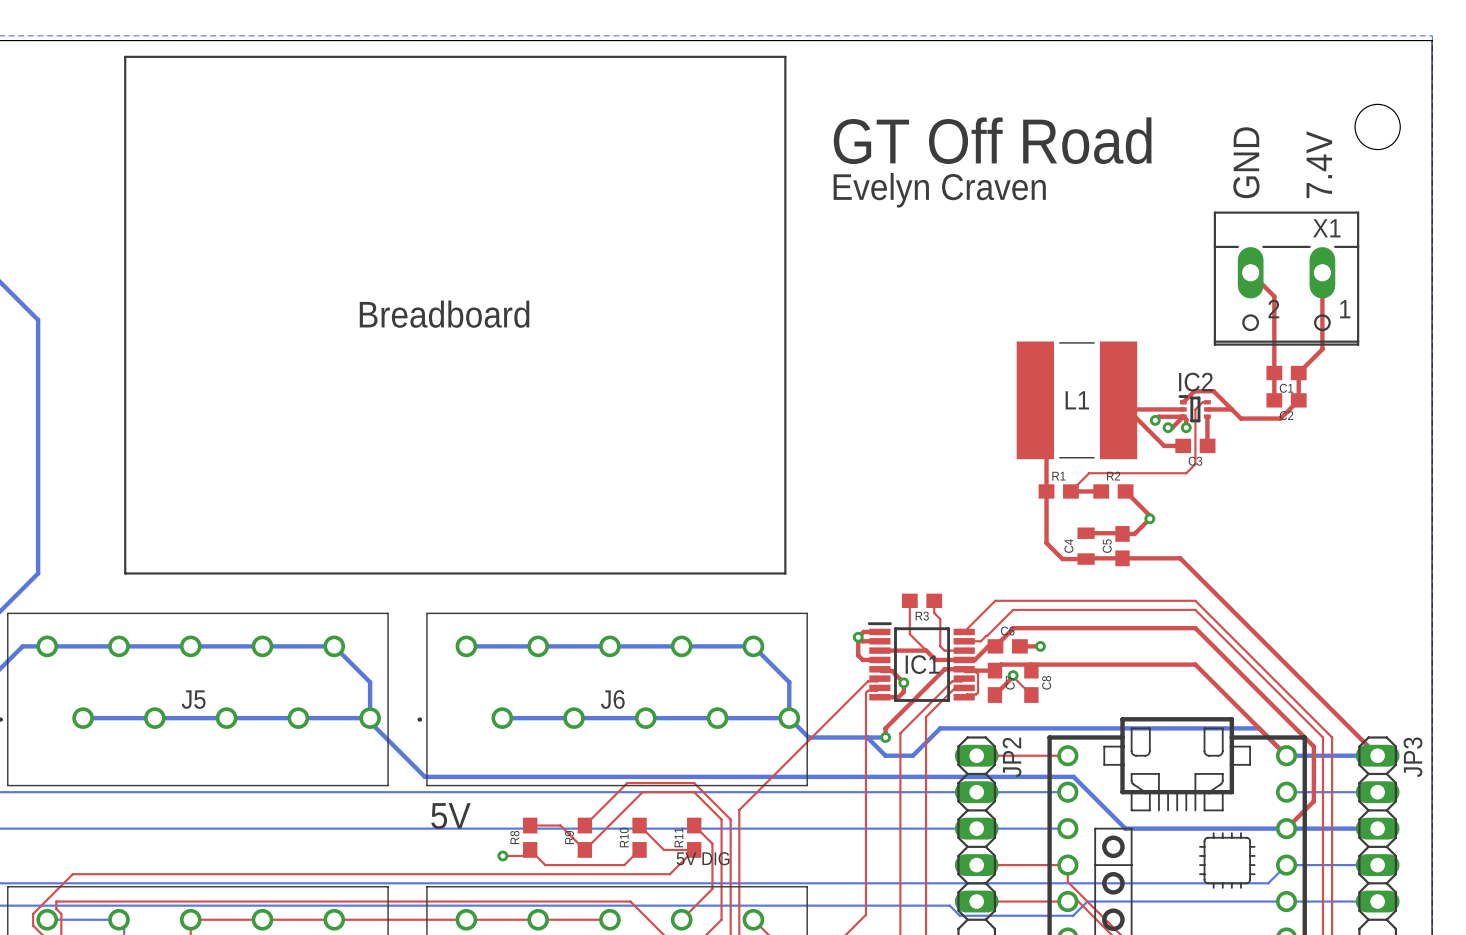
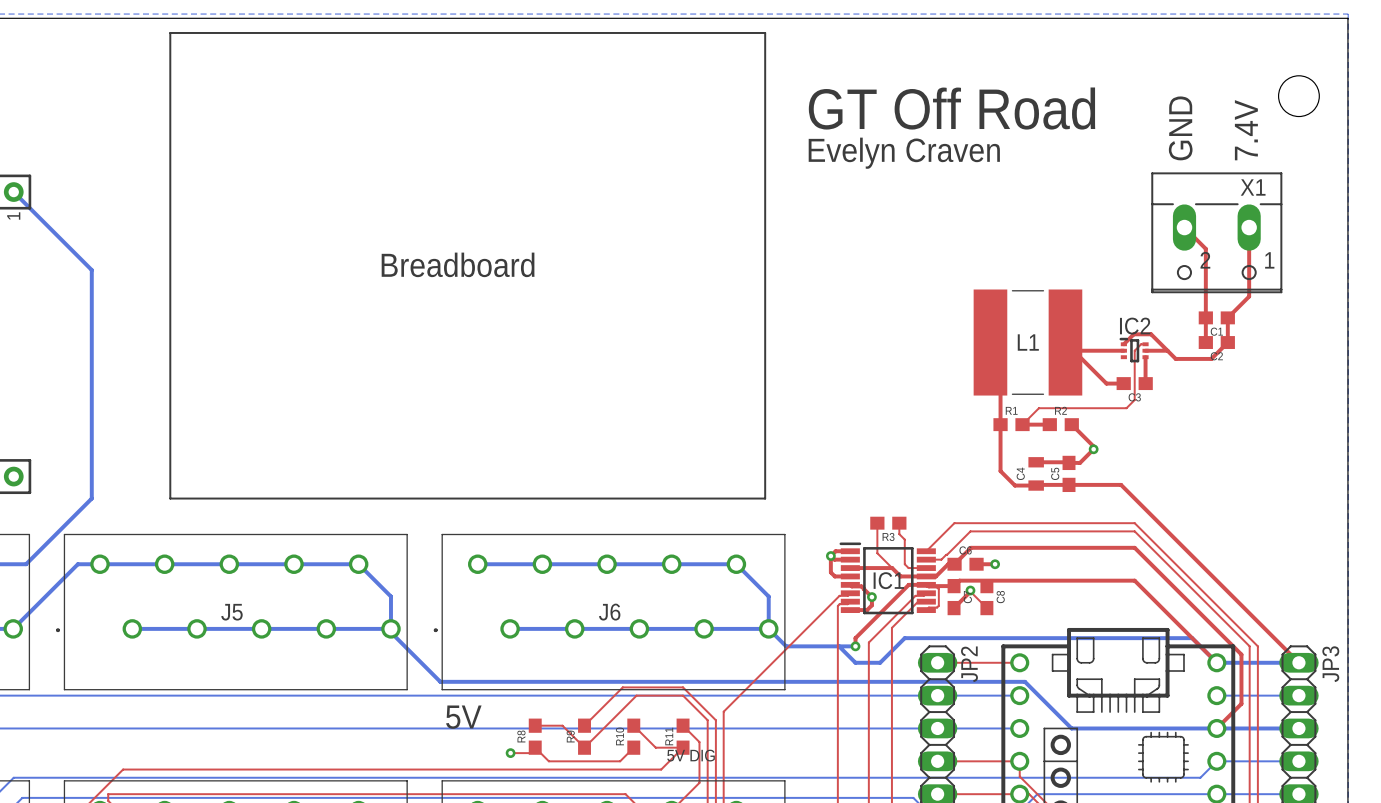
top track: (1183, 416) (1158, 416) (1155, 420) -> none
via: (1155, 420) -> none
top track: (1168, 427) (1172, 427) (1183, 416) (1186, 419) (1186, 427) -> none
via: (1168, 427) -> none
via: (1186, 427) -> none

